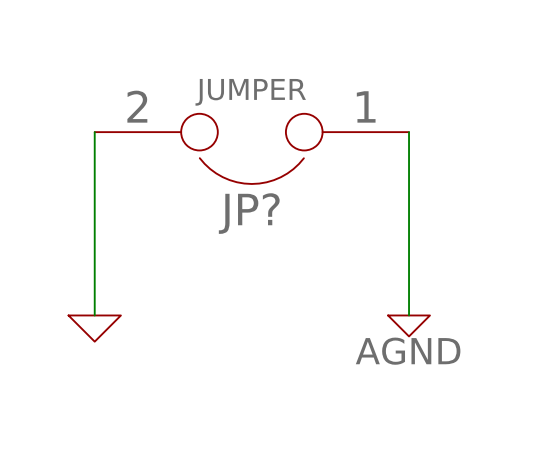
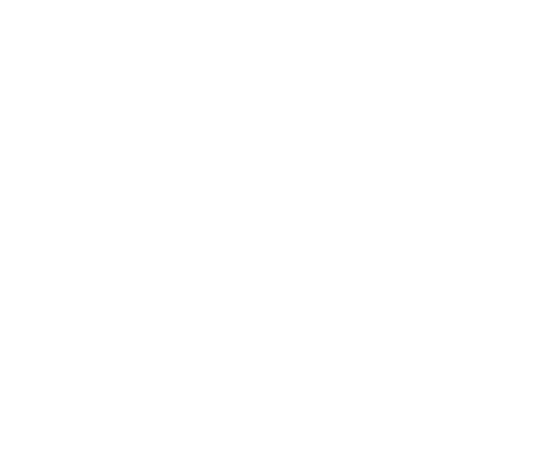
wire: (94, 132) (94, 315) -> none
wire: (409, 132) (409, 315) -> none
JP?: JUMPER (251, 148) -> none
power symbol: AGND (409, 325) -> none
power symbol: (94, 328) -> none

